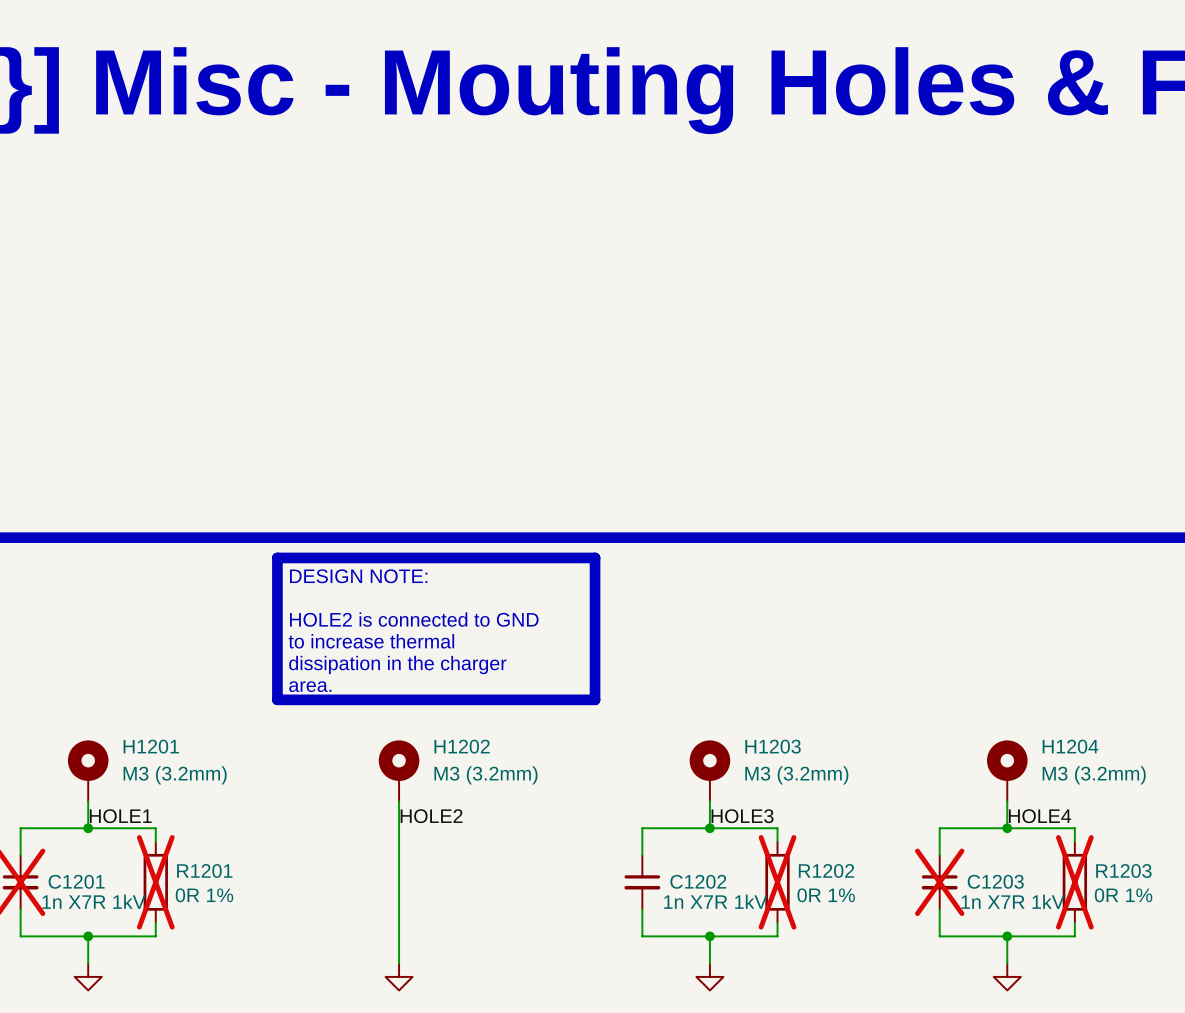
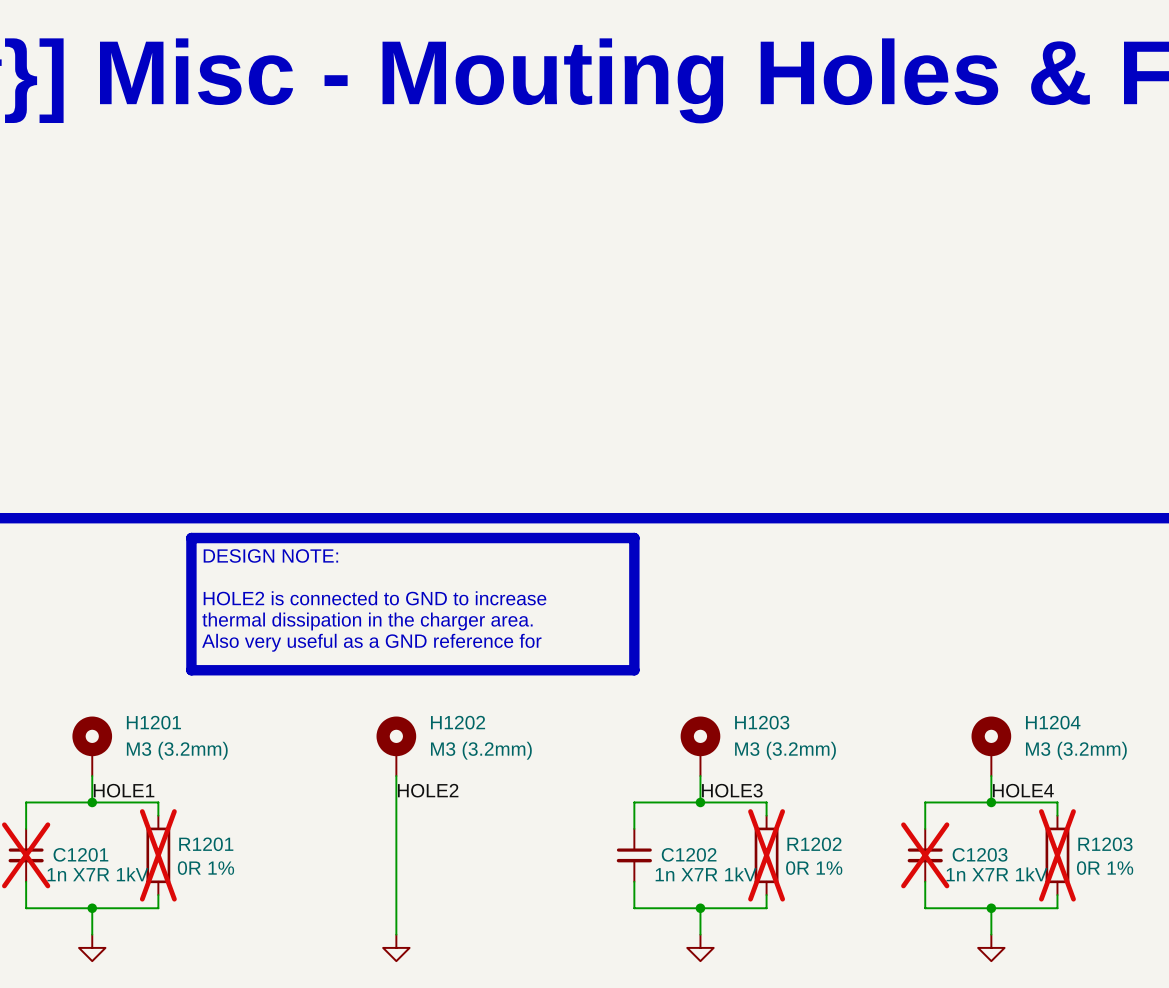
line: (277, 557) (277, 699) (595, 699) (595, 557) -> (277, 538) (191, 538) (191, 670) (634, 670) (634, 538) (588, 538)
text position: DESIGN NOTE: (358, 576) -> DESIGN NOTE: (270, 555)
text: HOLE2 is connected to GND (414, 619) -> HOLE2 is connected to GND to increase (375, 598)
text: to increase thermal (371, 641) -> none
text: none -> Also very useful as a GND reference for (371, 642)
text: dissipation in the charger (397, 665) -> thermal dissipation in the charger area. (367, 621)
text: area. (310, 686) -> none

